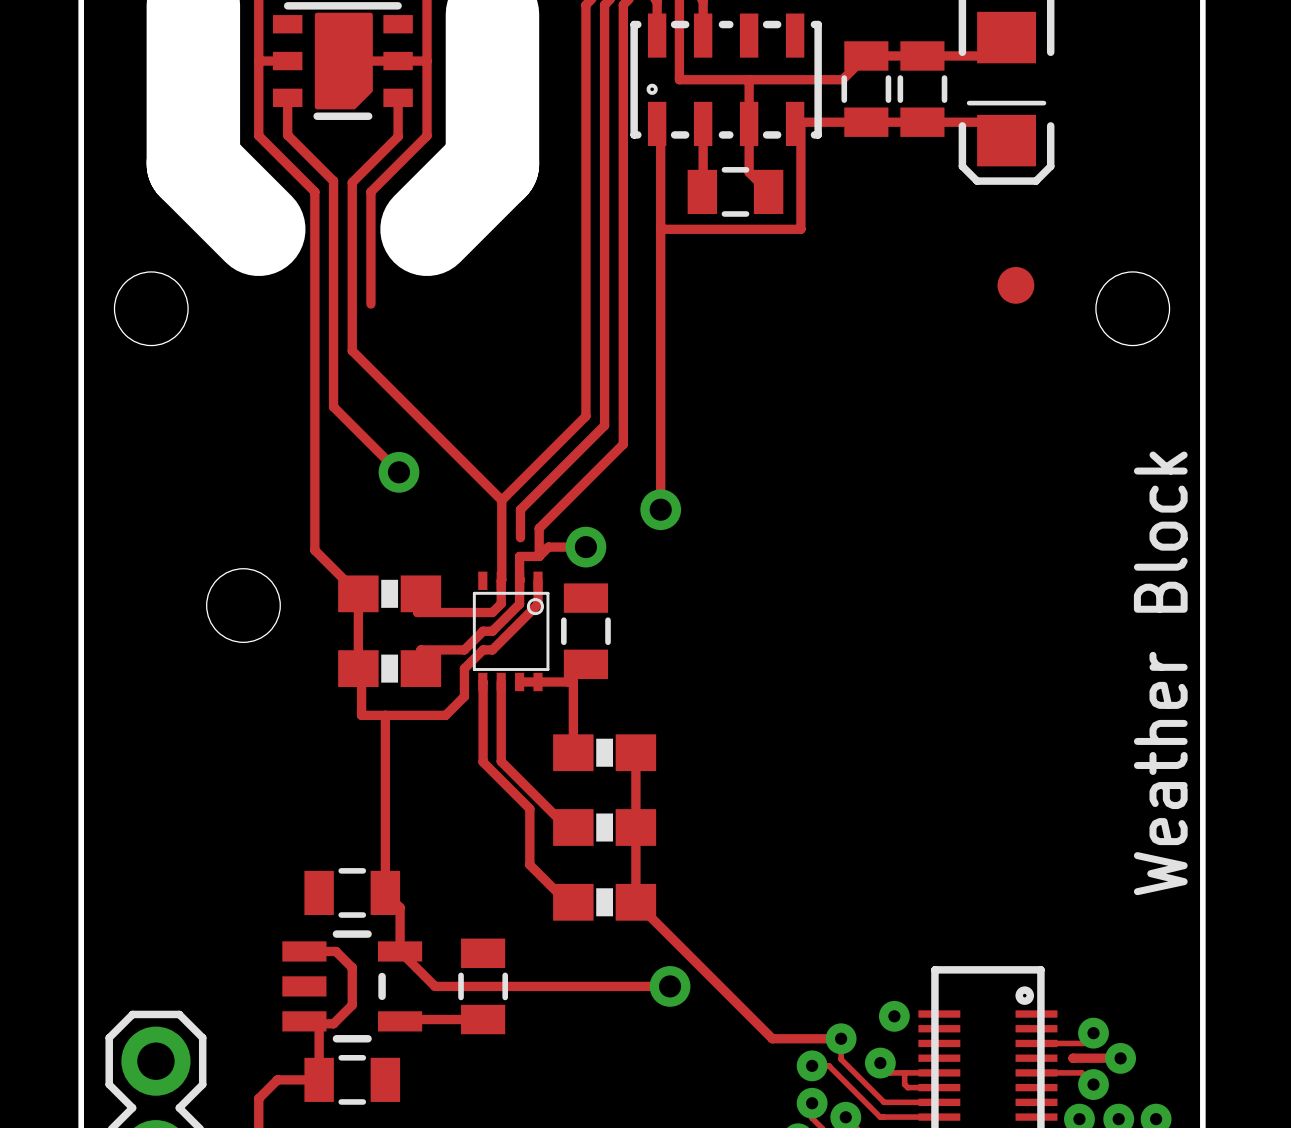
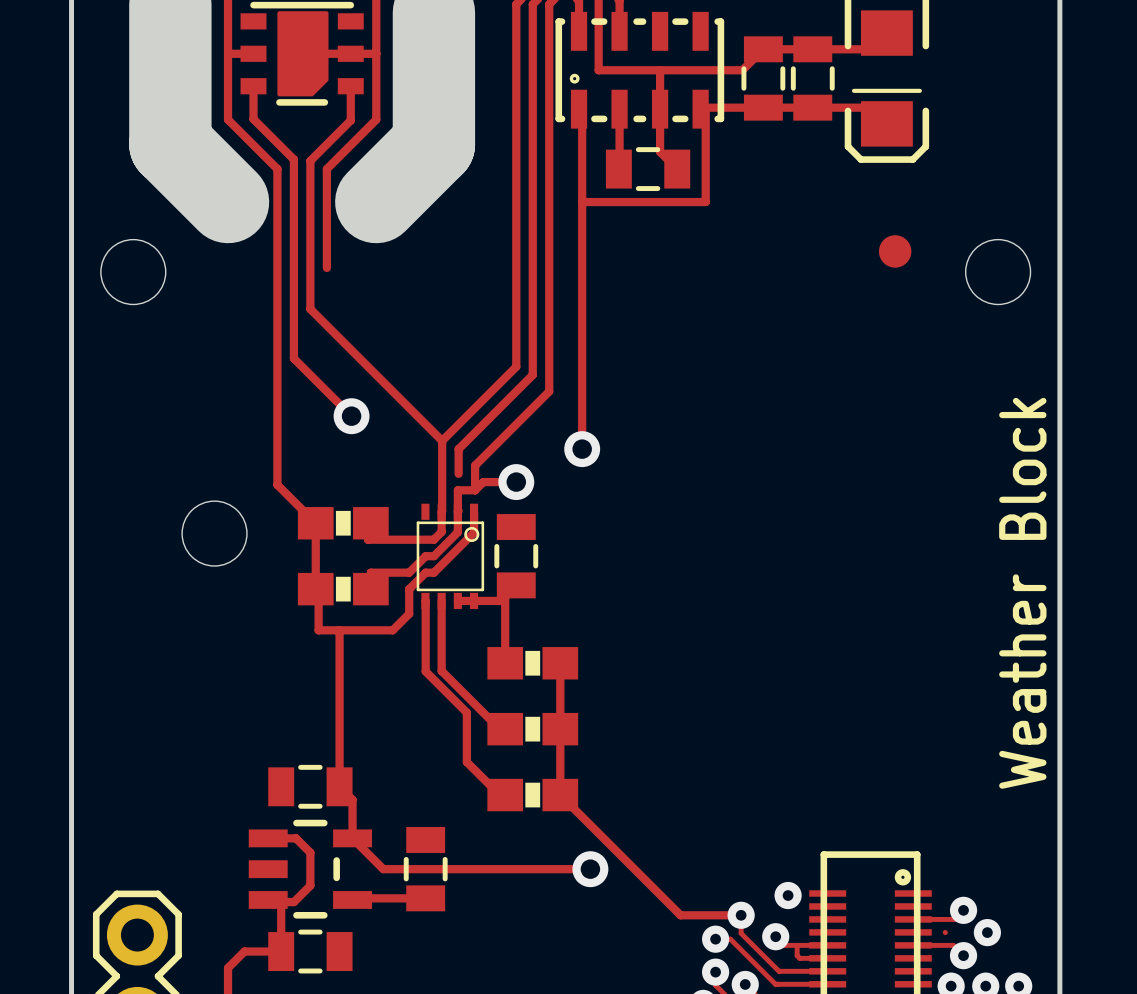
track: (1073, 1058) (1120, 1058) -> none

